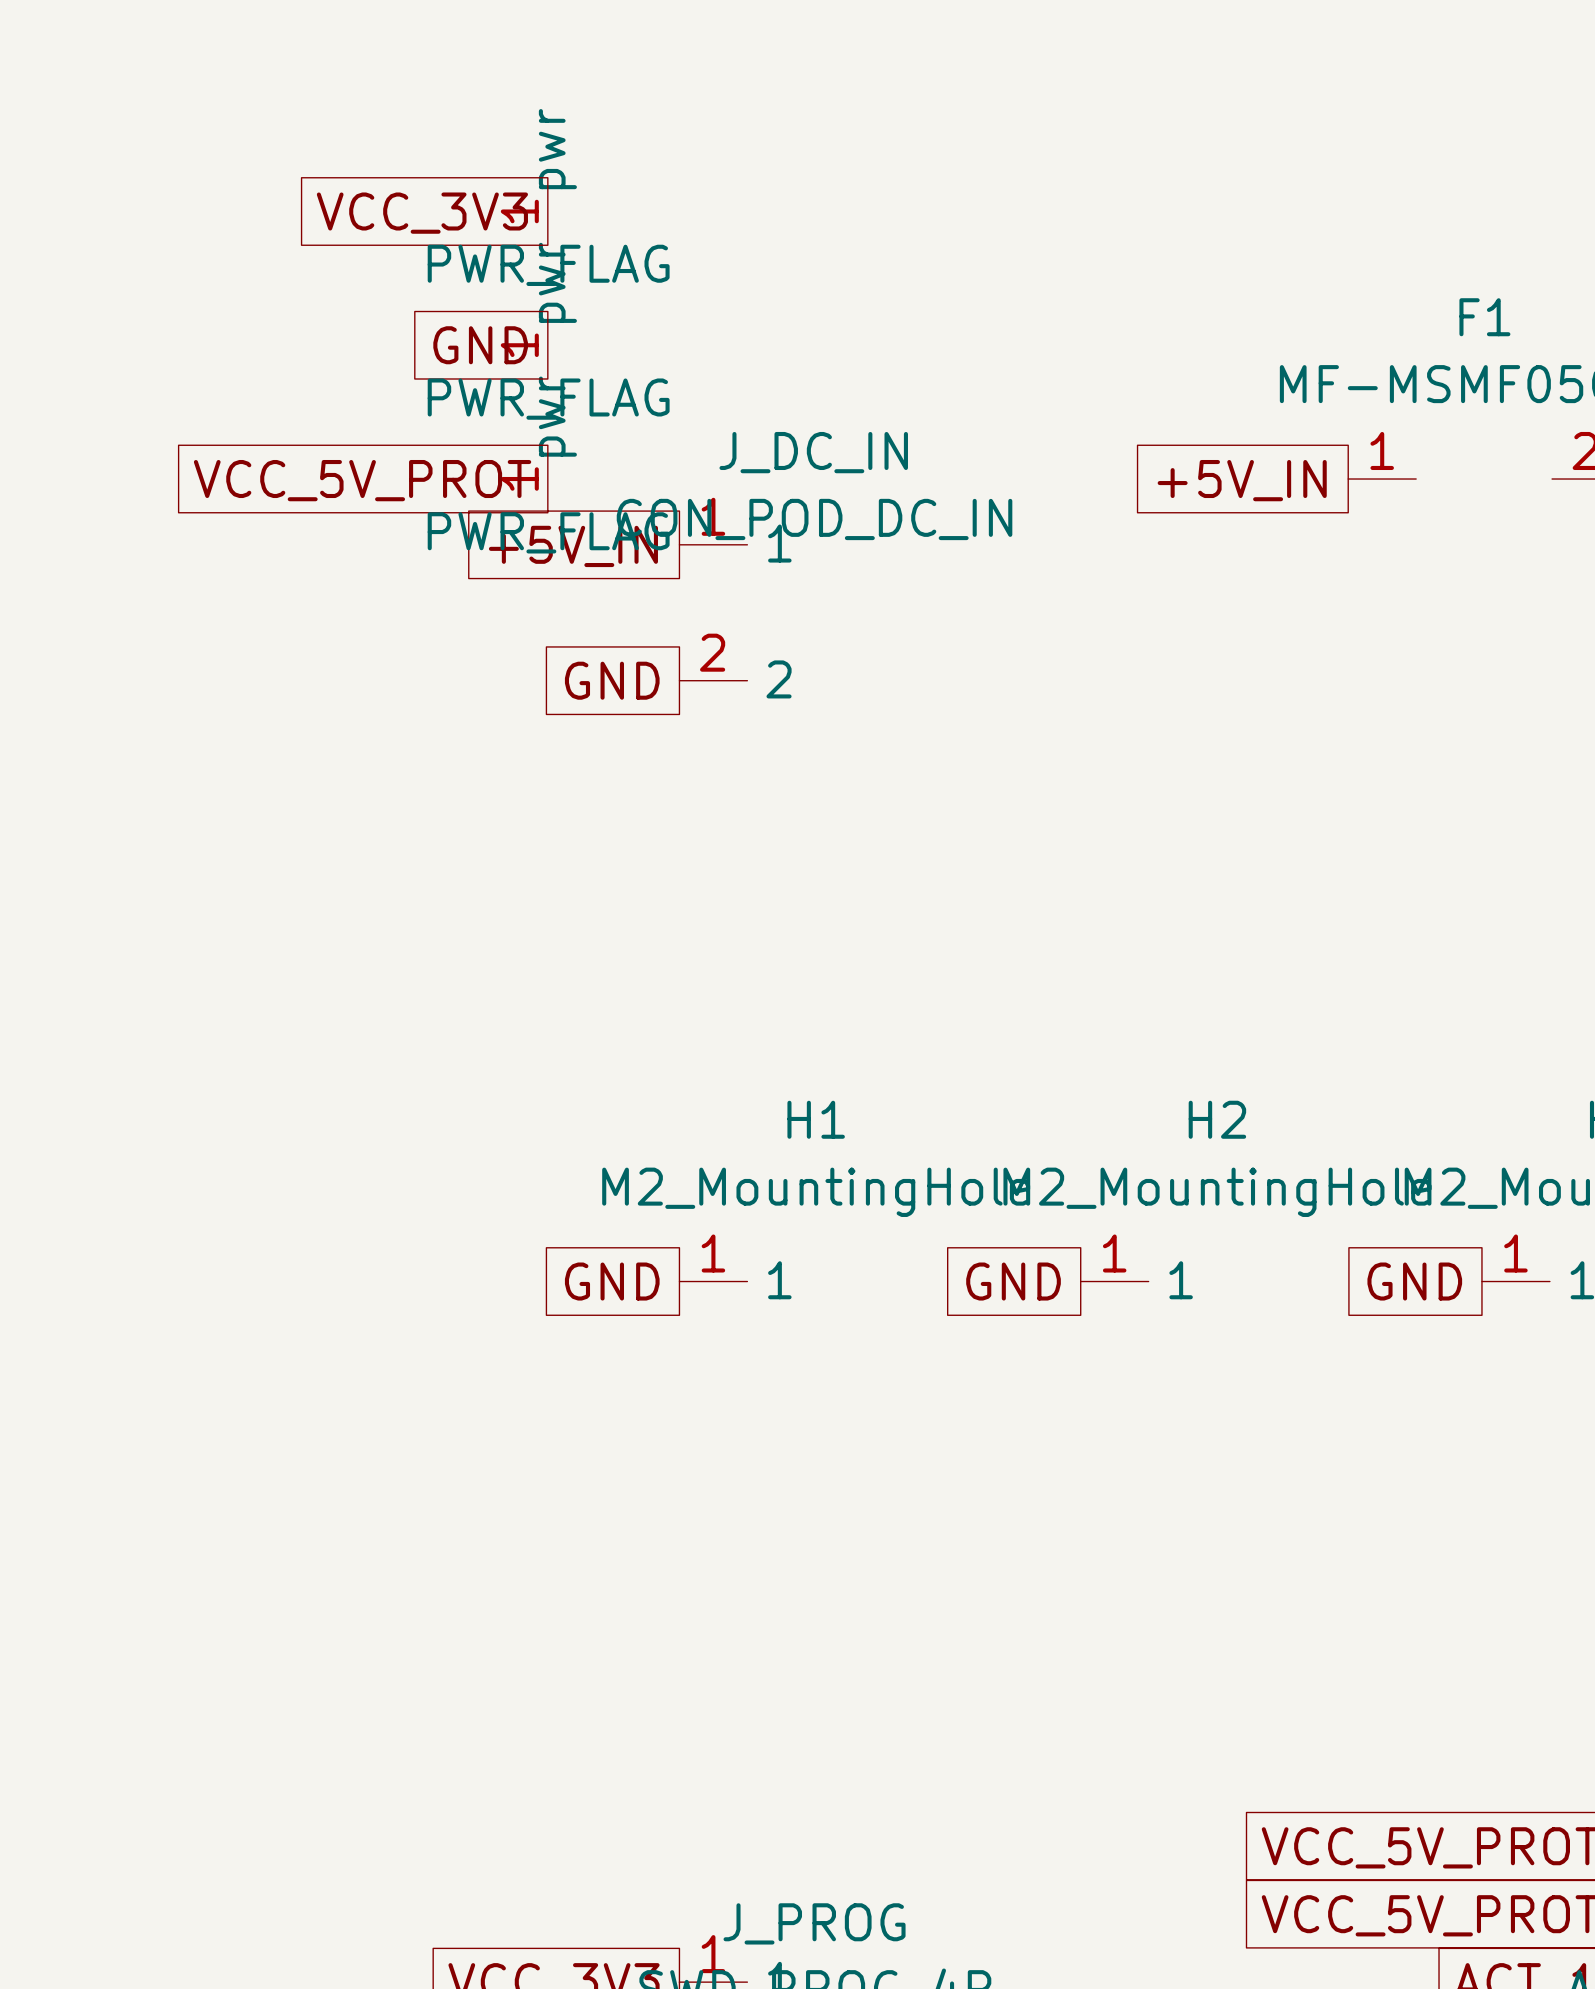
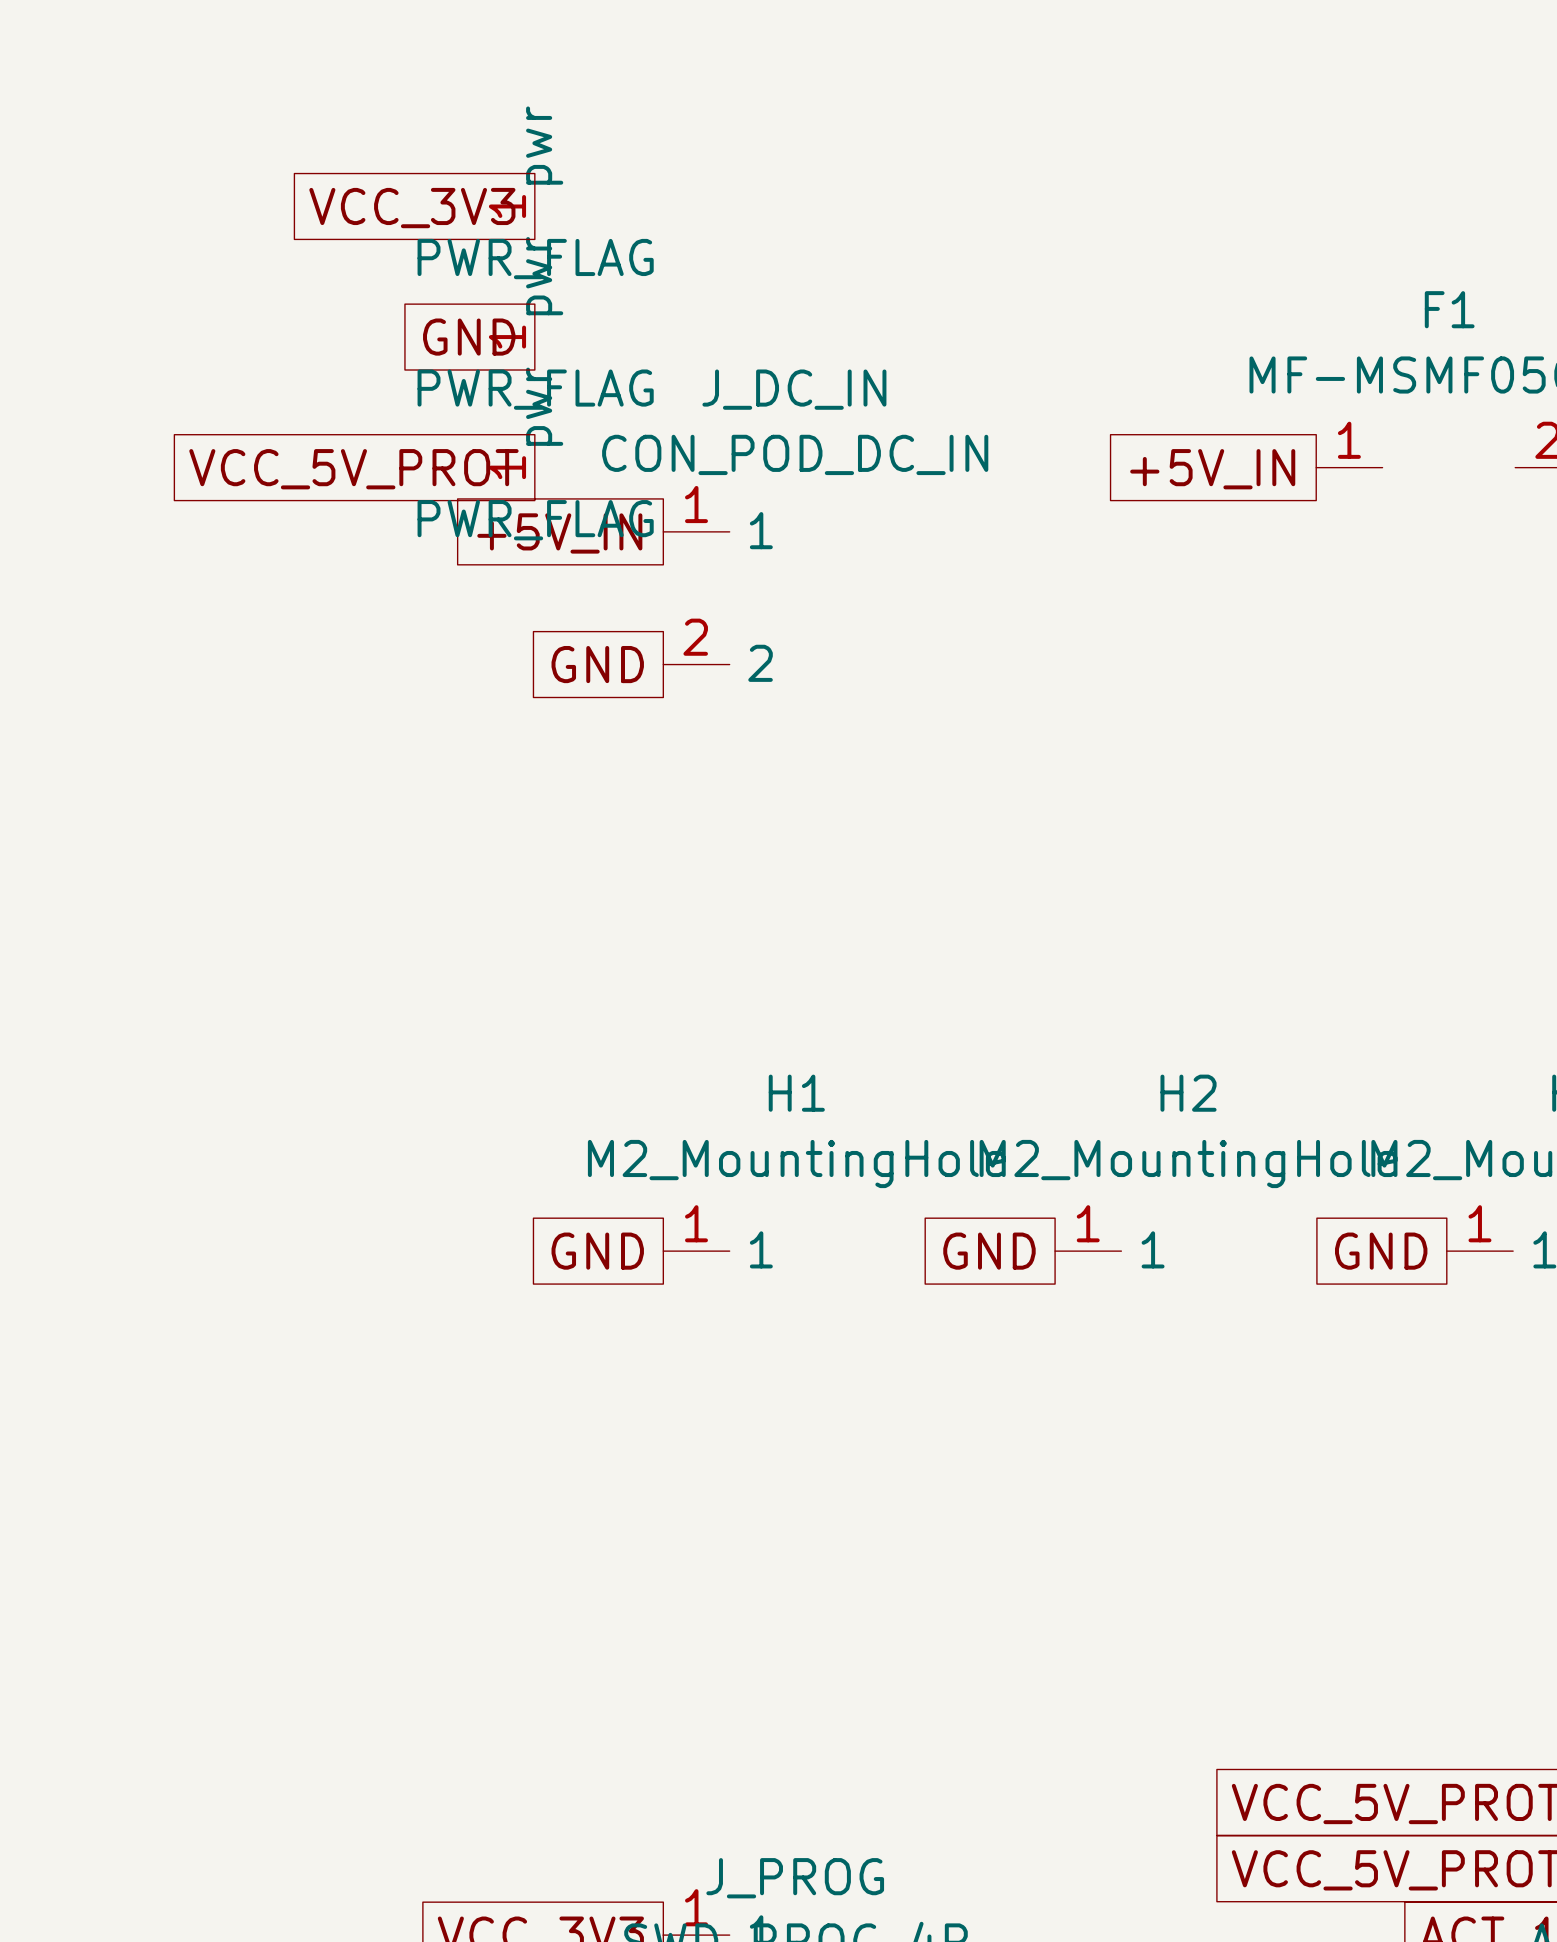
J_DC_IN name position: J_DC_IN (813, 452) -> J_DC_IN (794, 389)
J_DC_IN value position: CON_POD_DC_IN (814, 519) -> CON_POD_DC_IN (795, 454)

